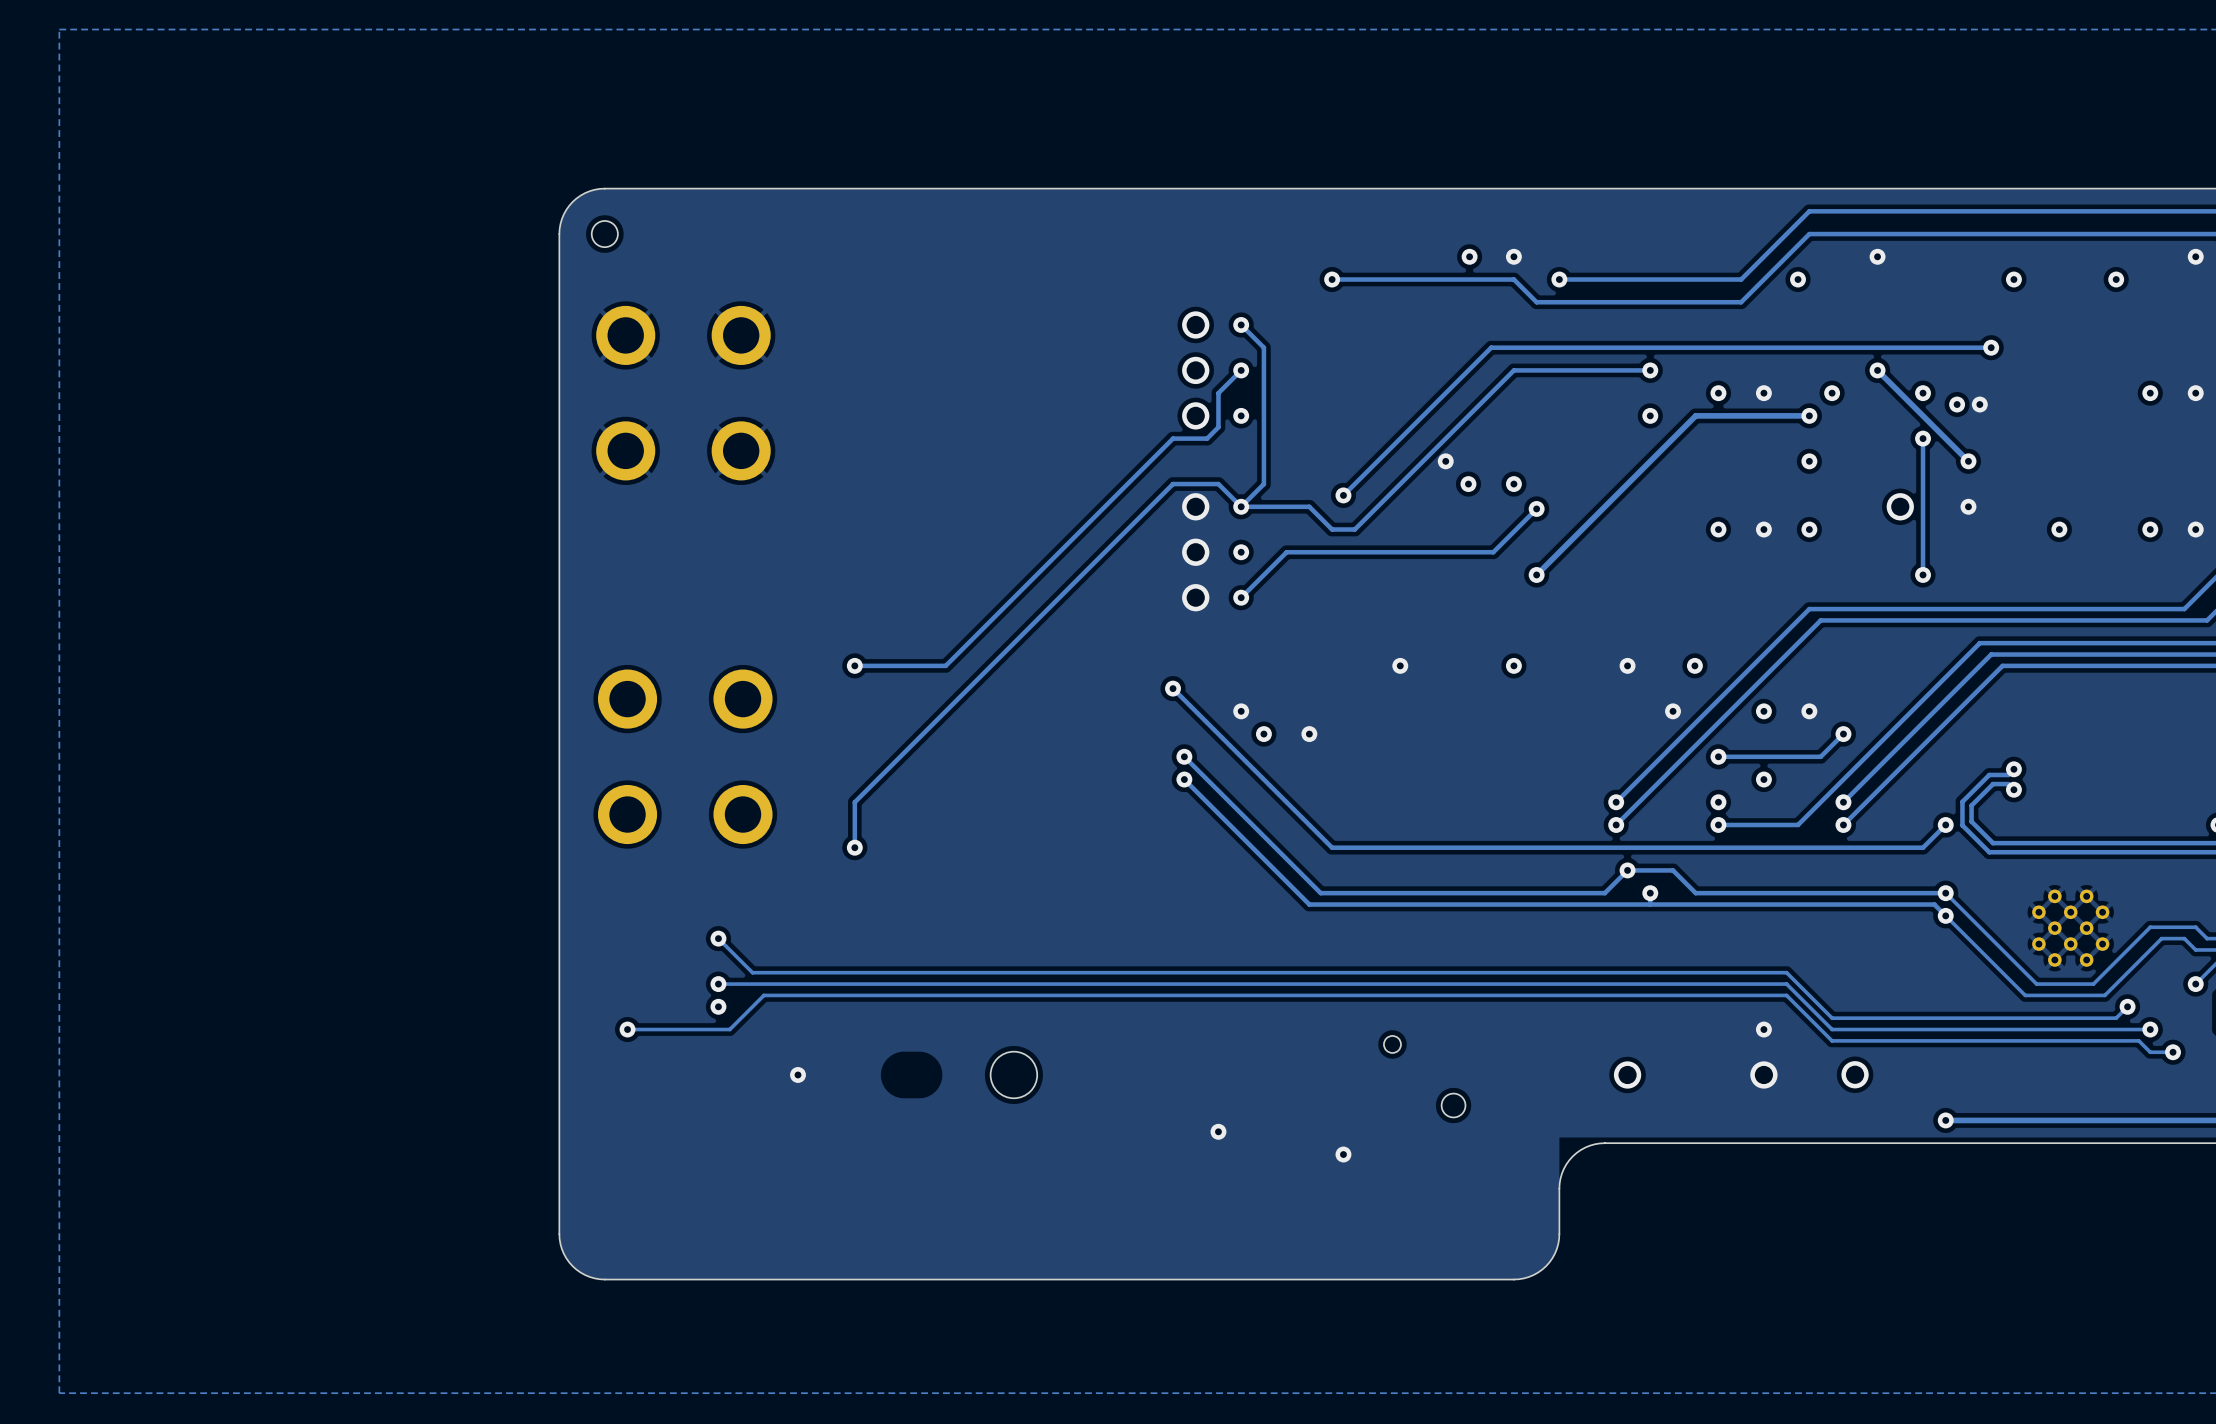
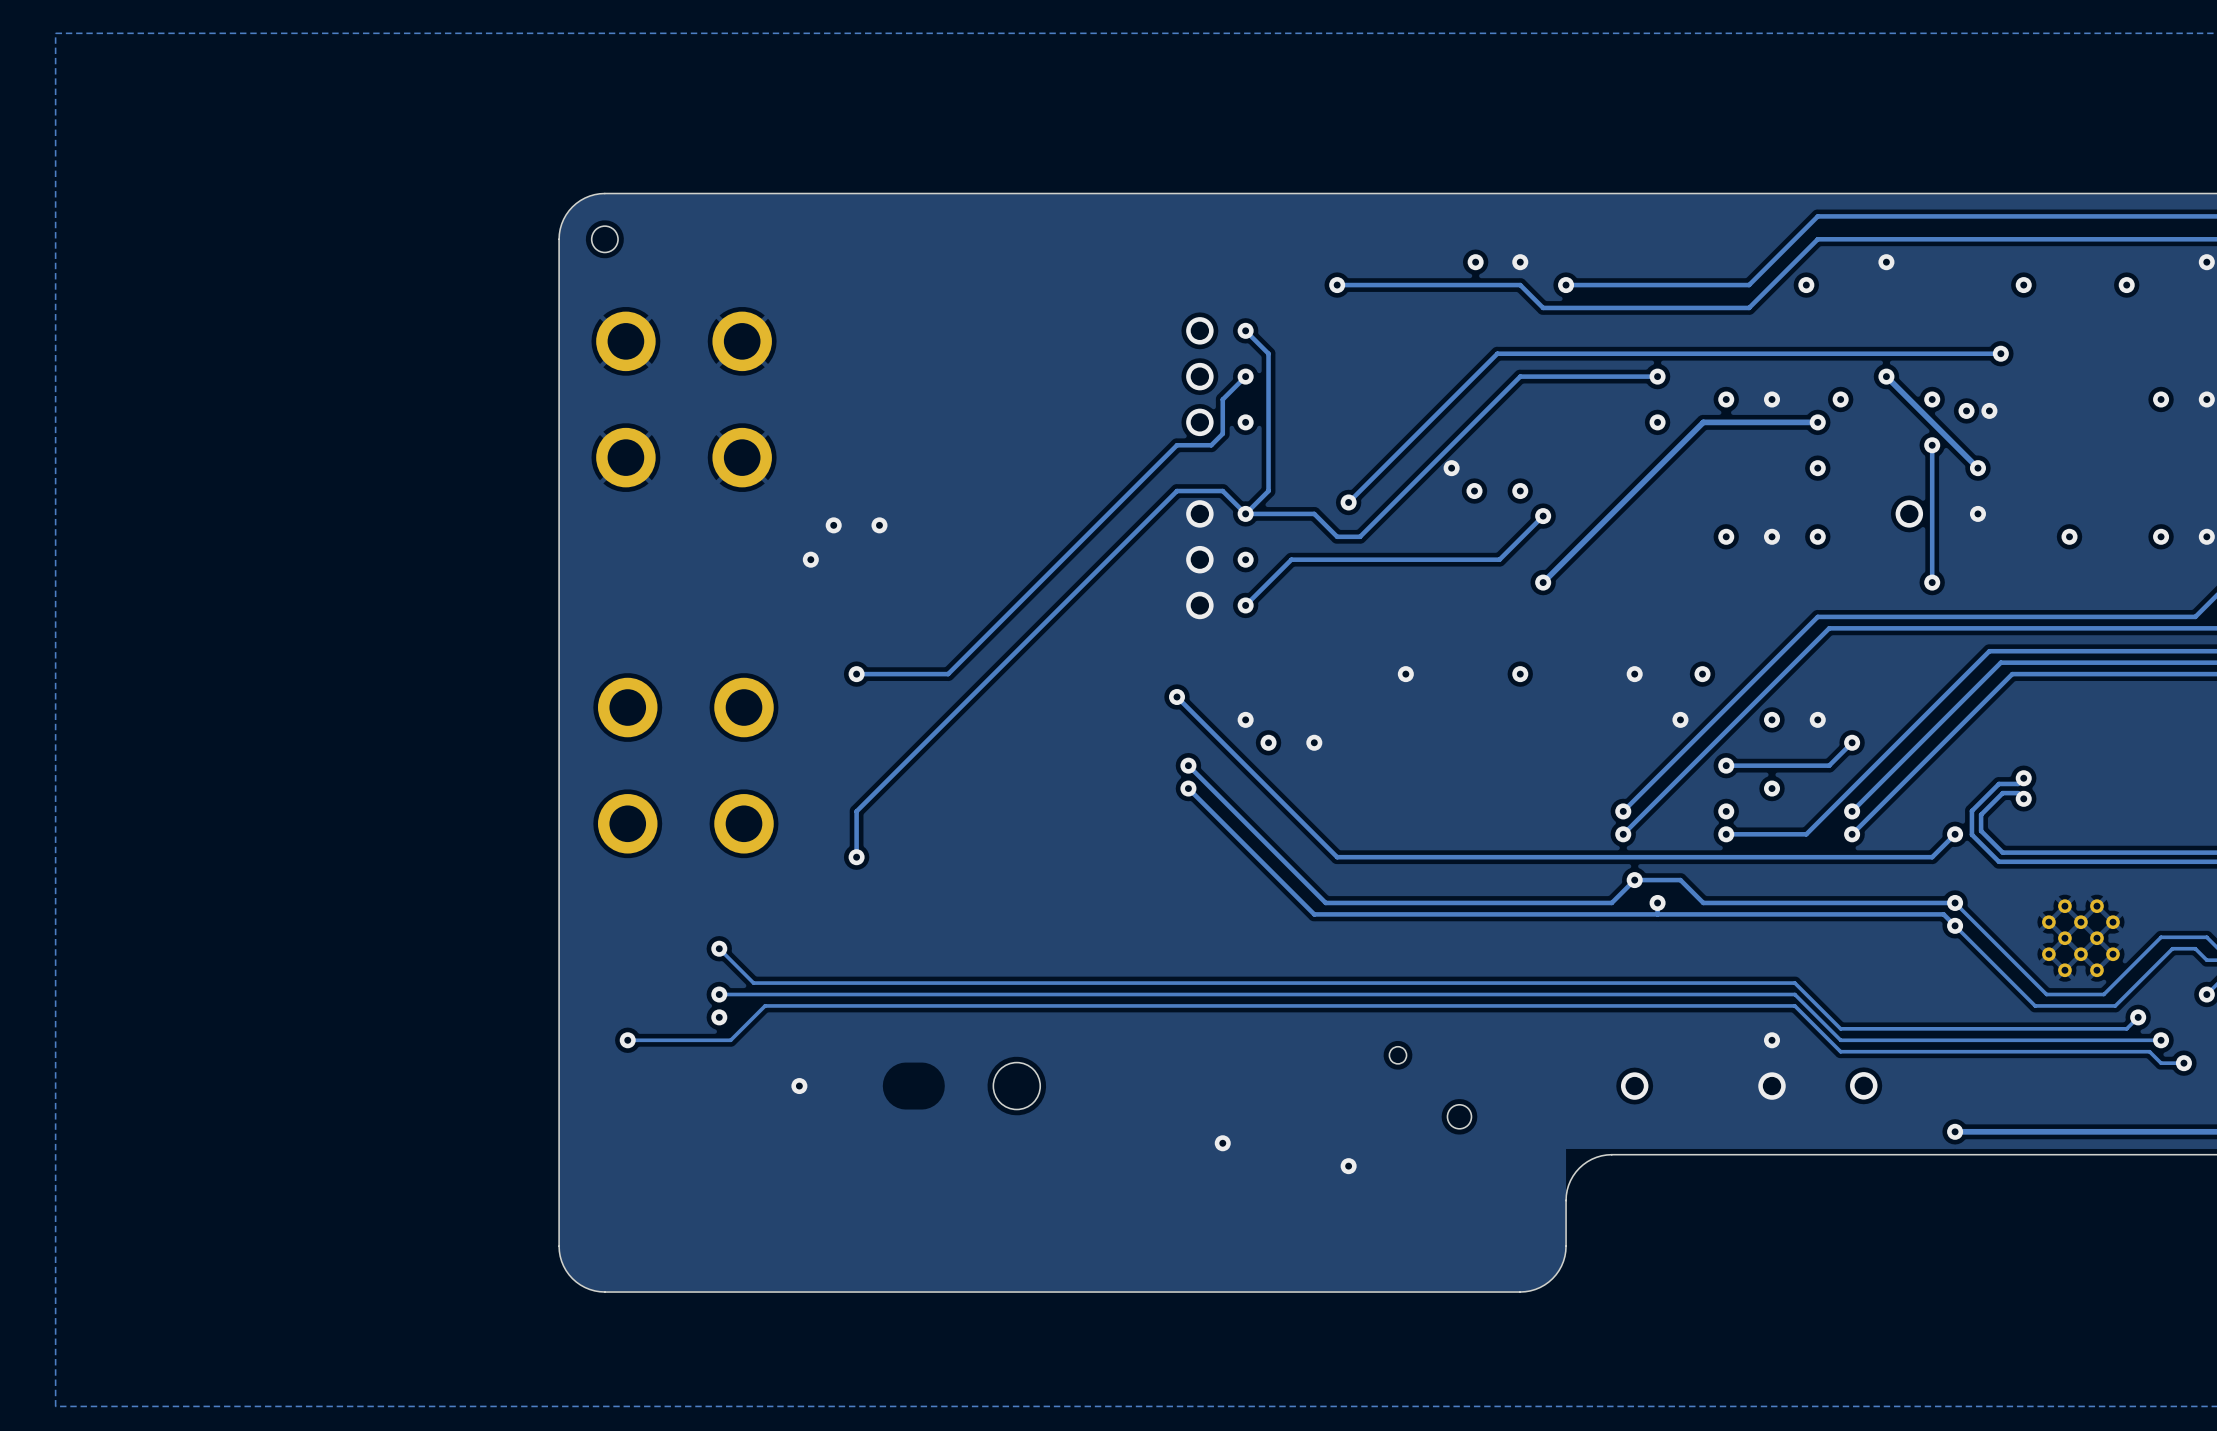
via: none -> (833, 525)
via: none -> (879, 525)
via: none -> (810, 559)

